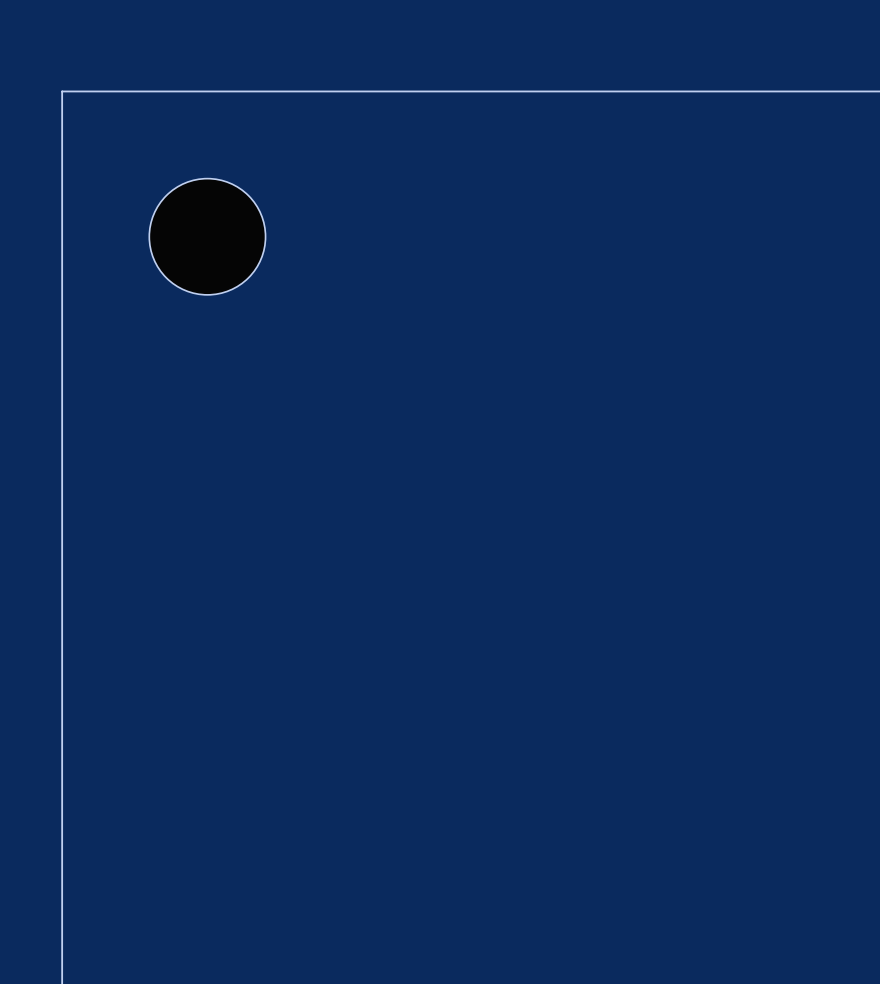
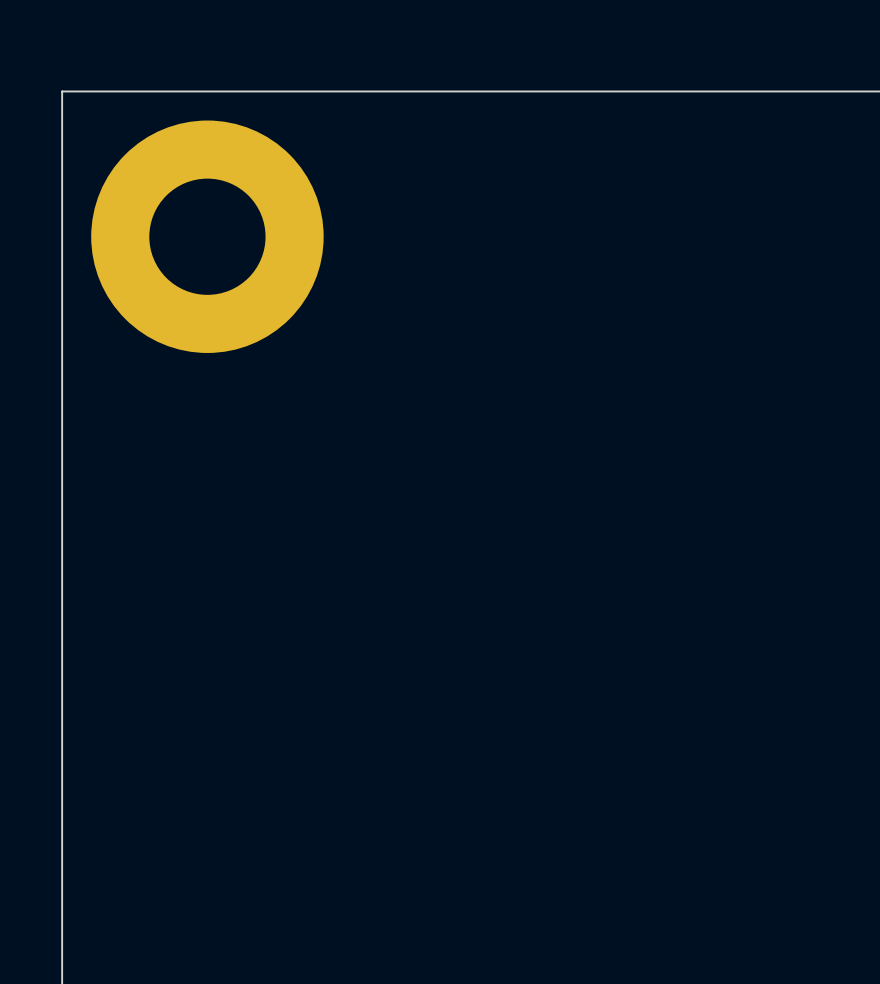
part footprint: [149, 178, 266, 295] -> [91, 120, 324, 353]

